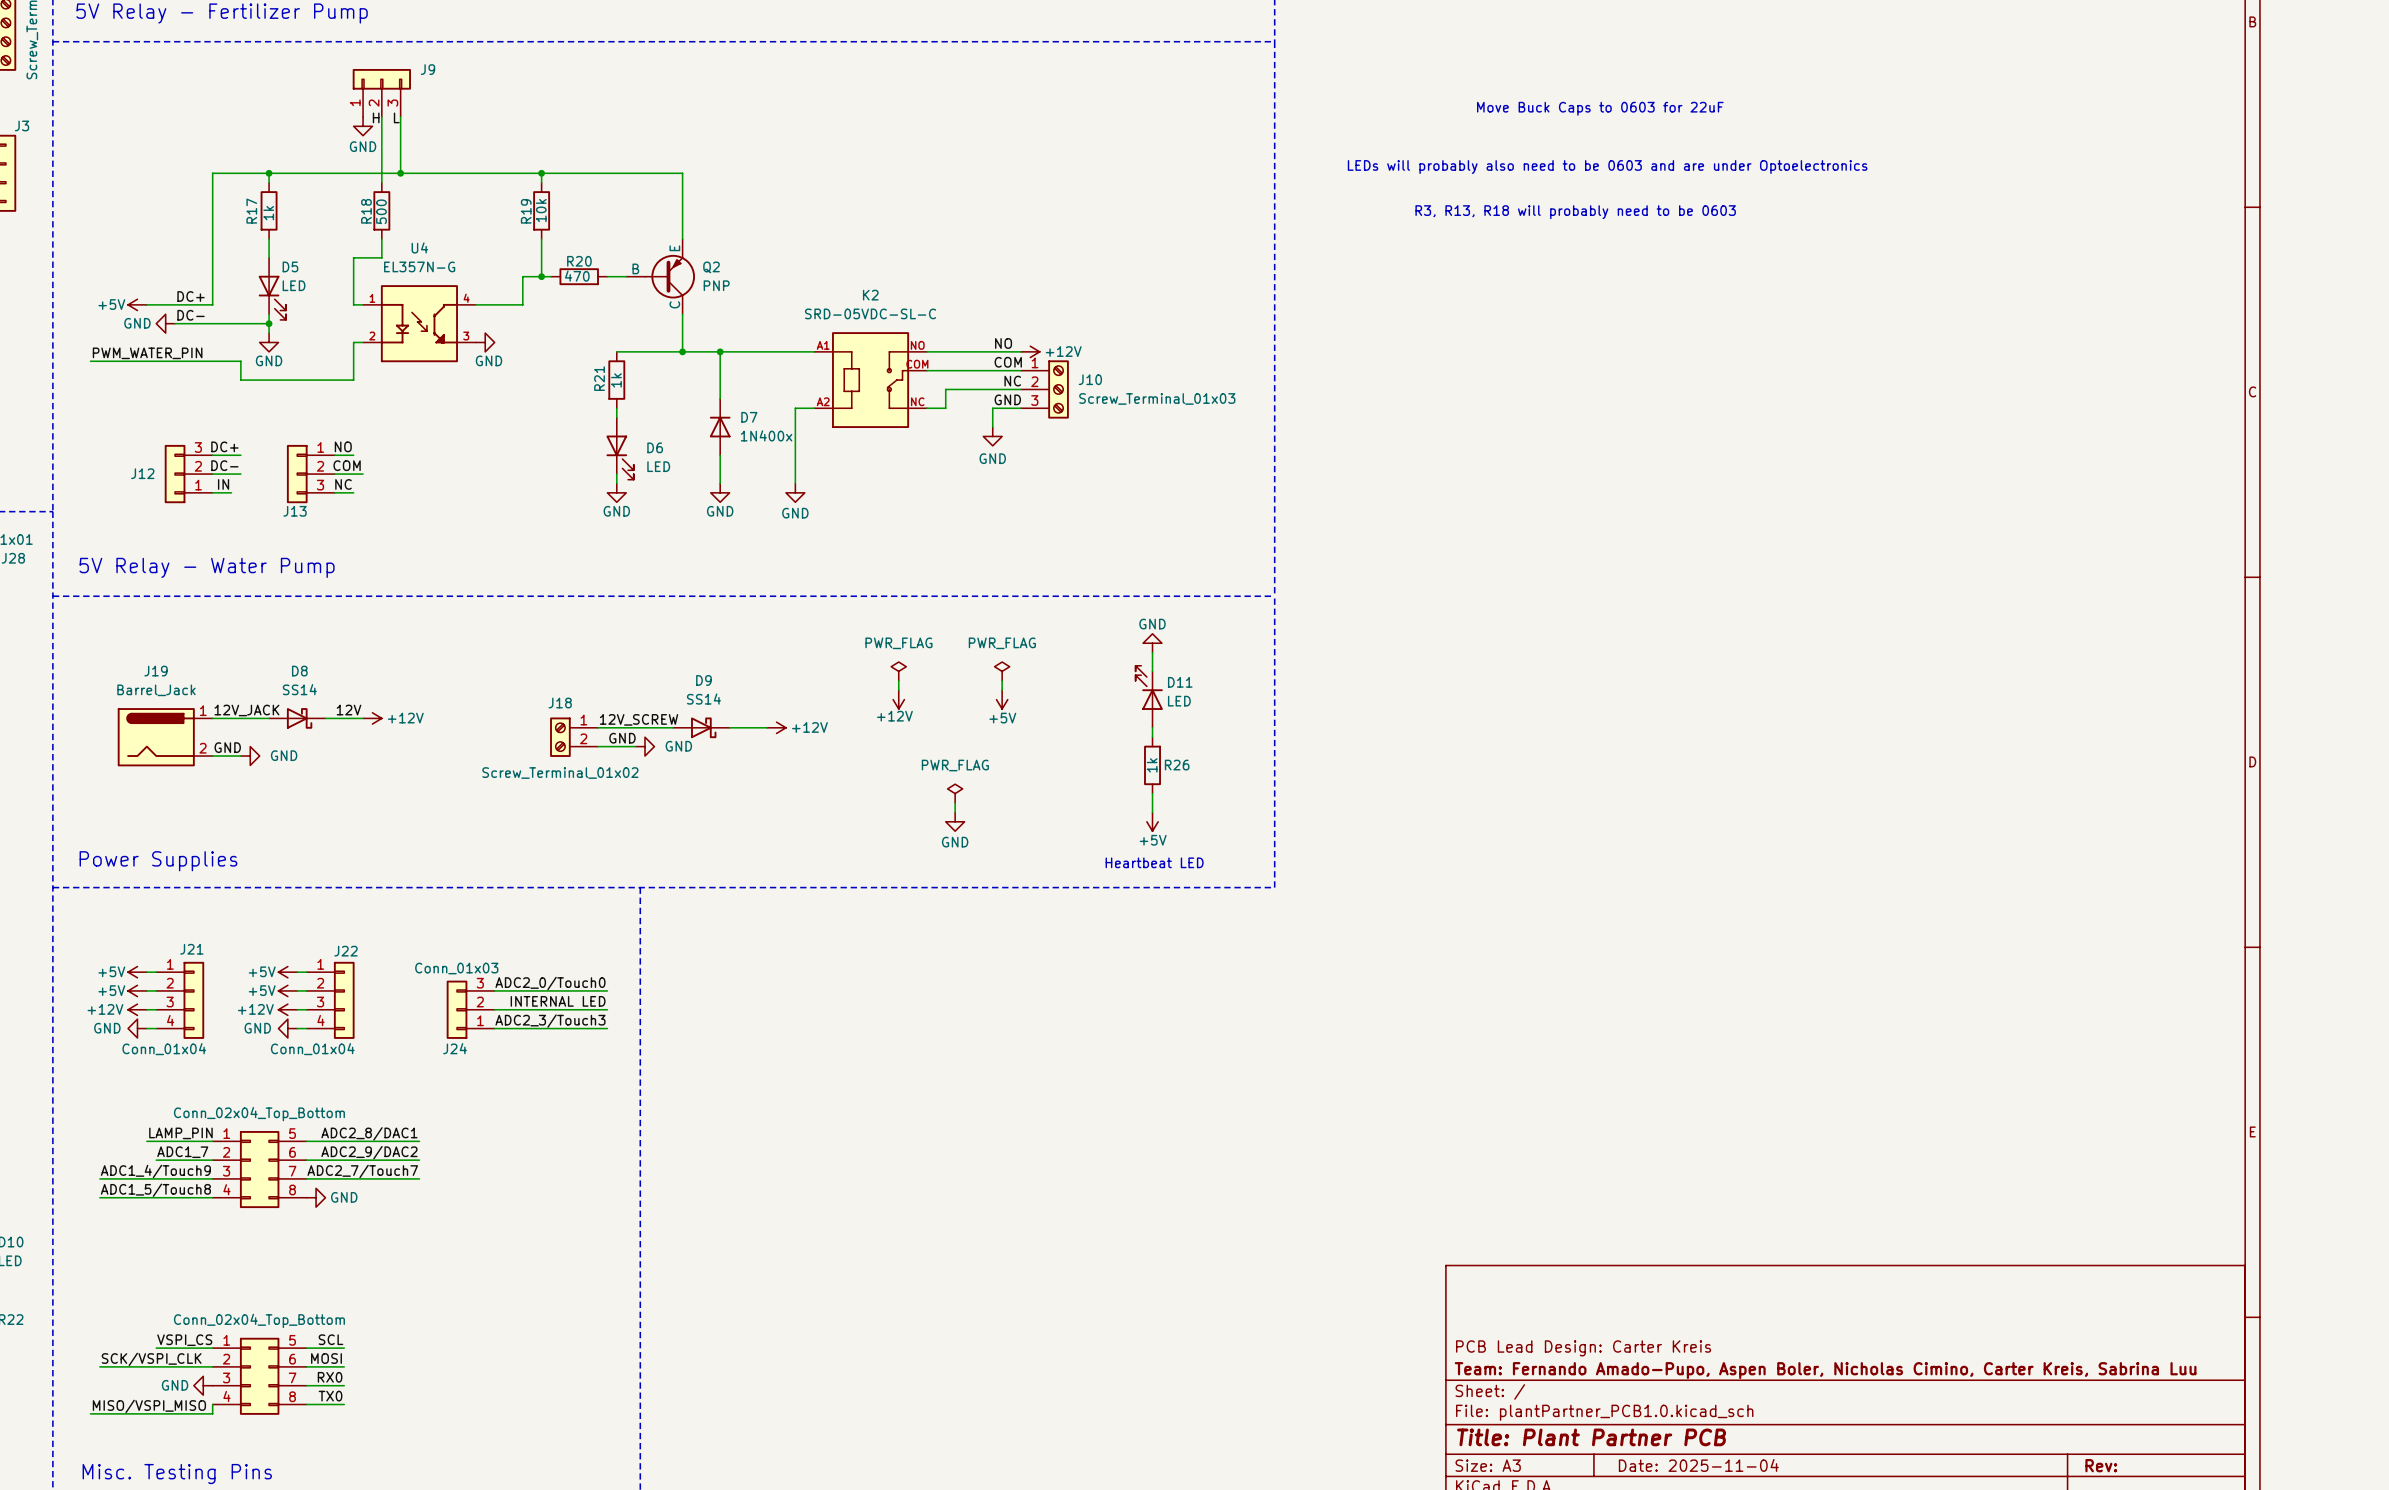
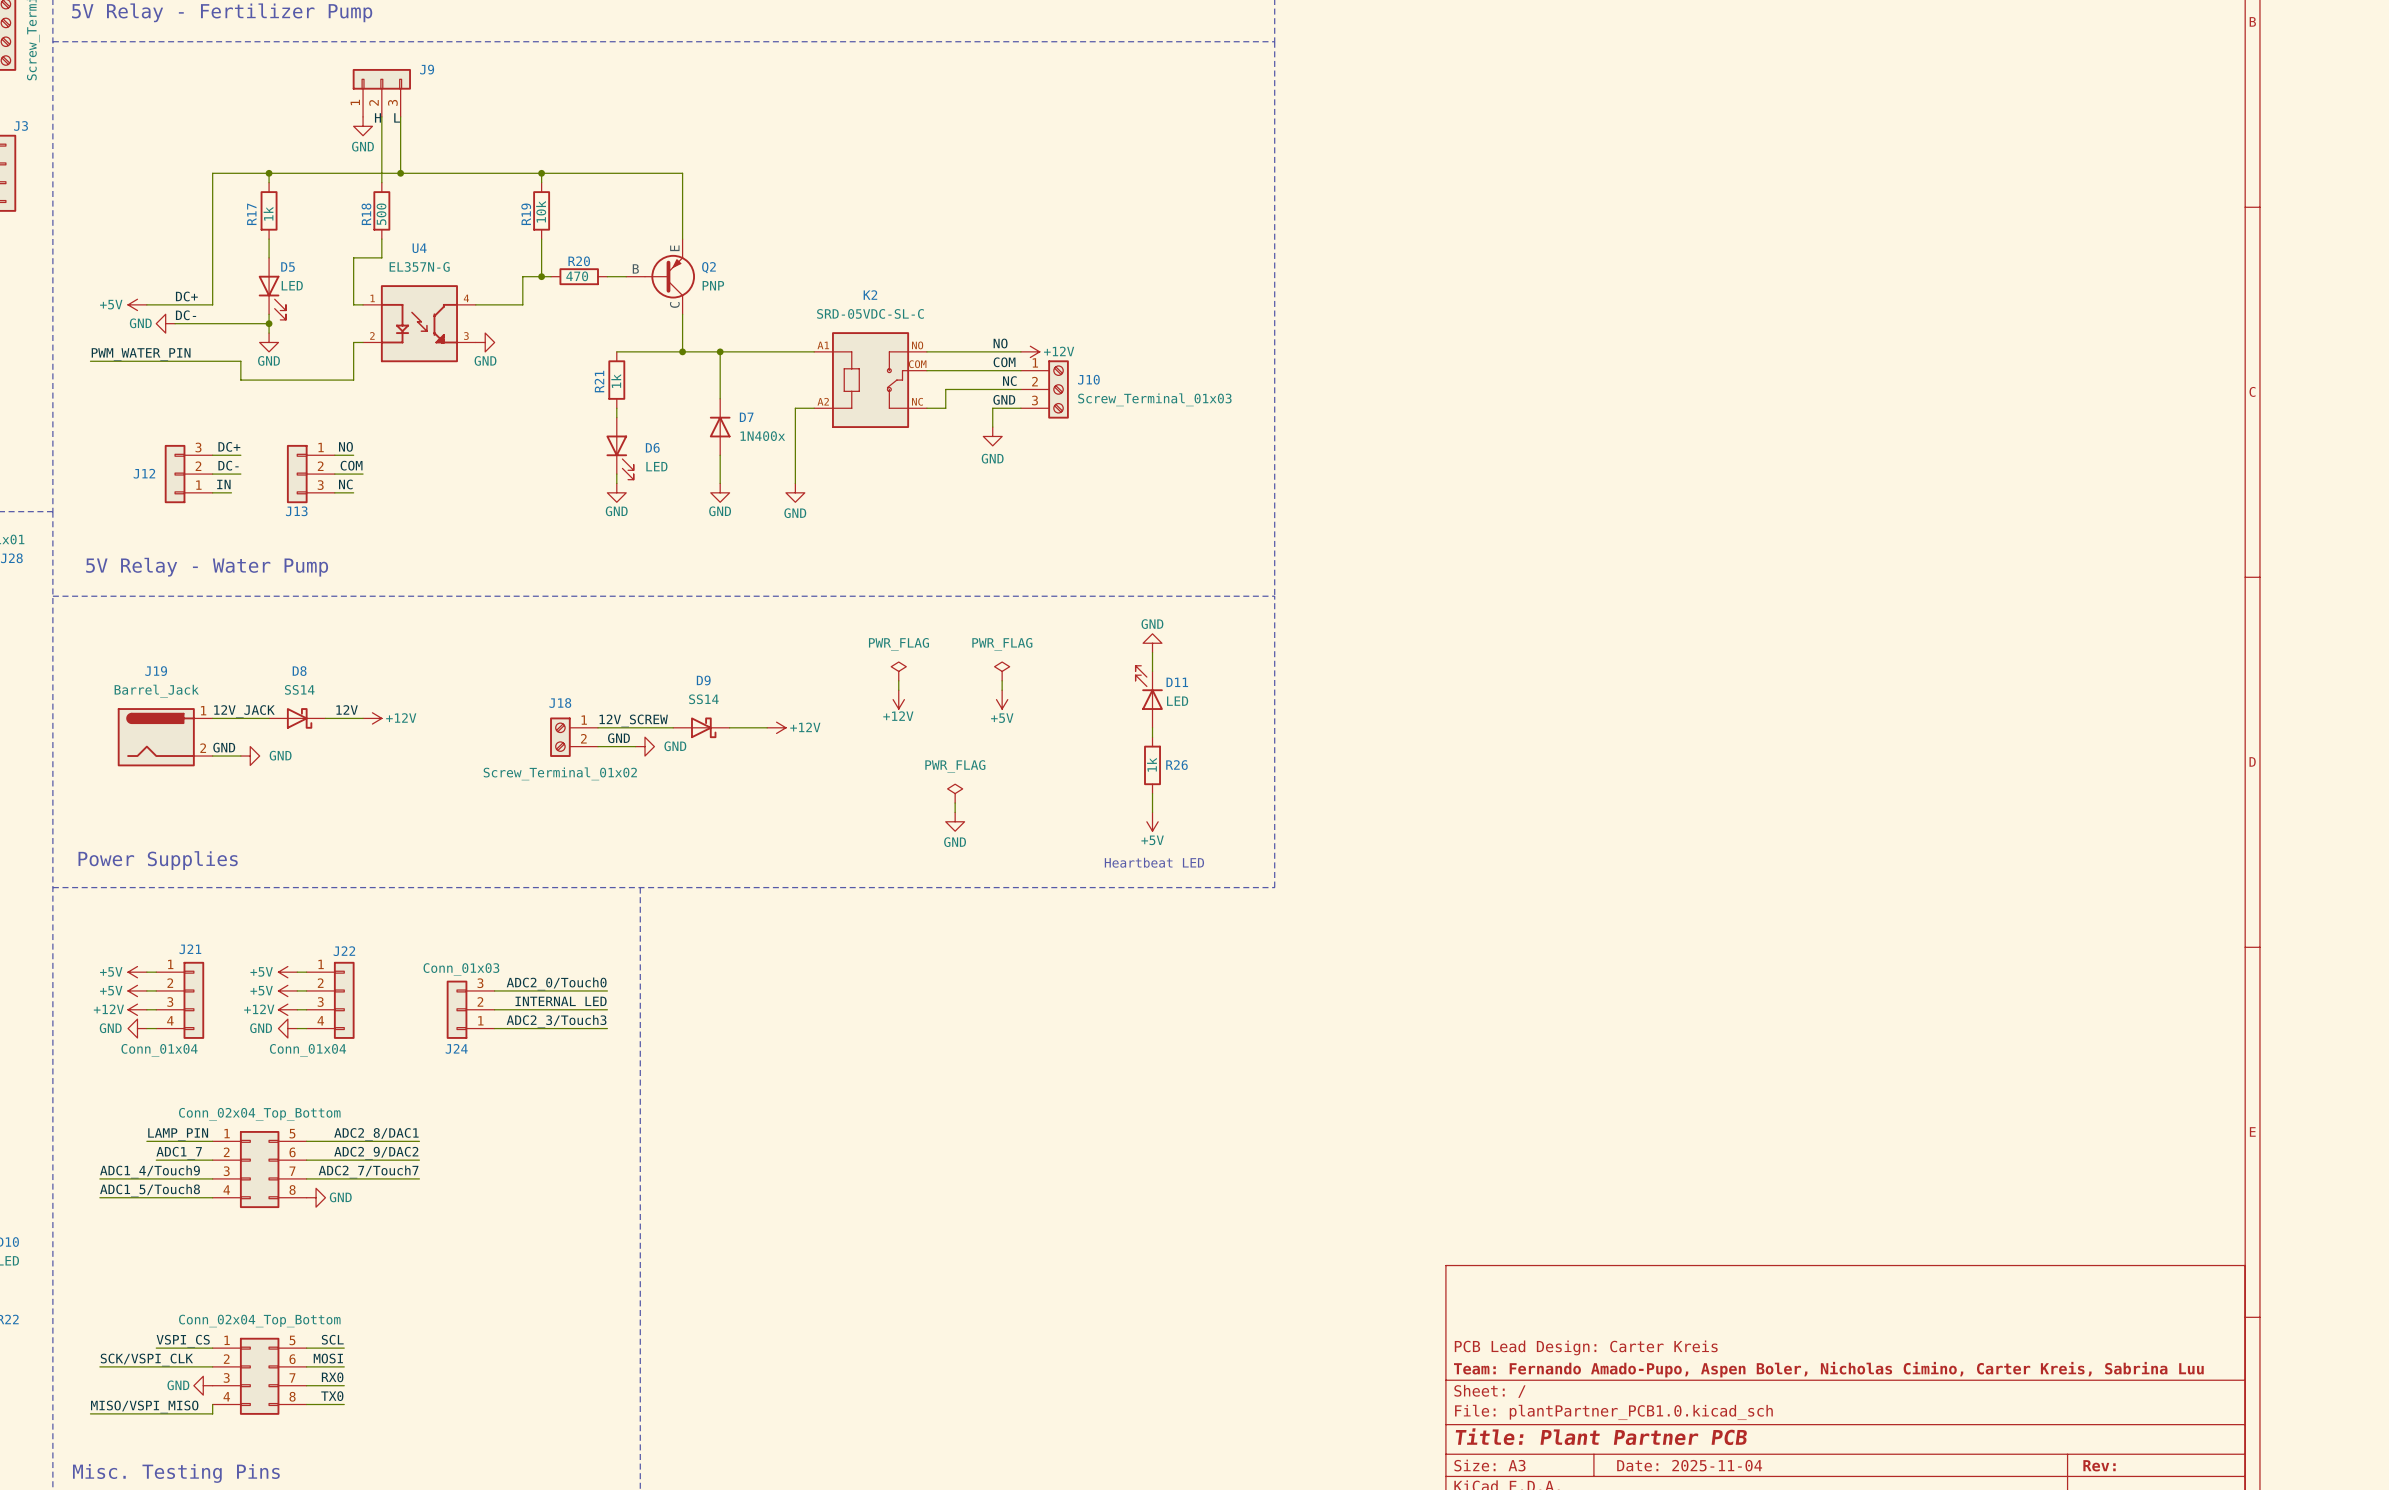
text: Move Buck Caps to 0603 for 22uF (1600, 108) -> none
text: LEDs will probably also need to be 0603 and are under Optoelectronics (1607, 167) -> none
text: R3, R13, R18 will probably need to be 0603 (1575, 212) -> none

